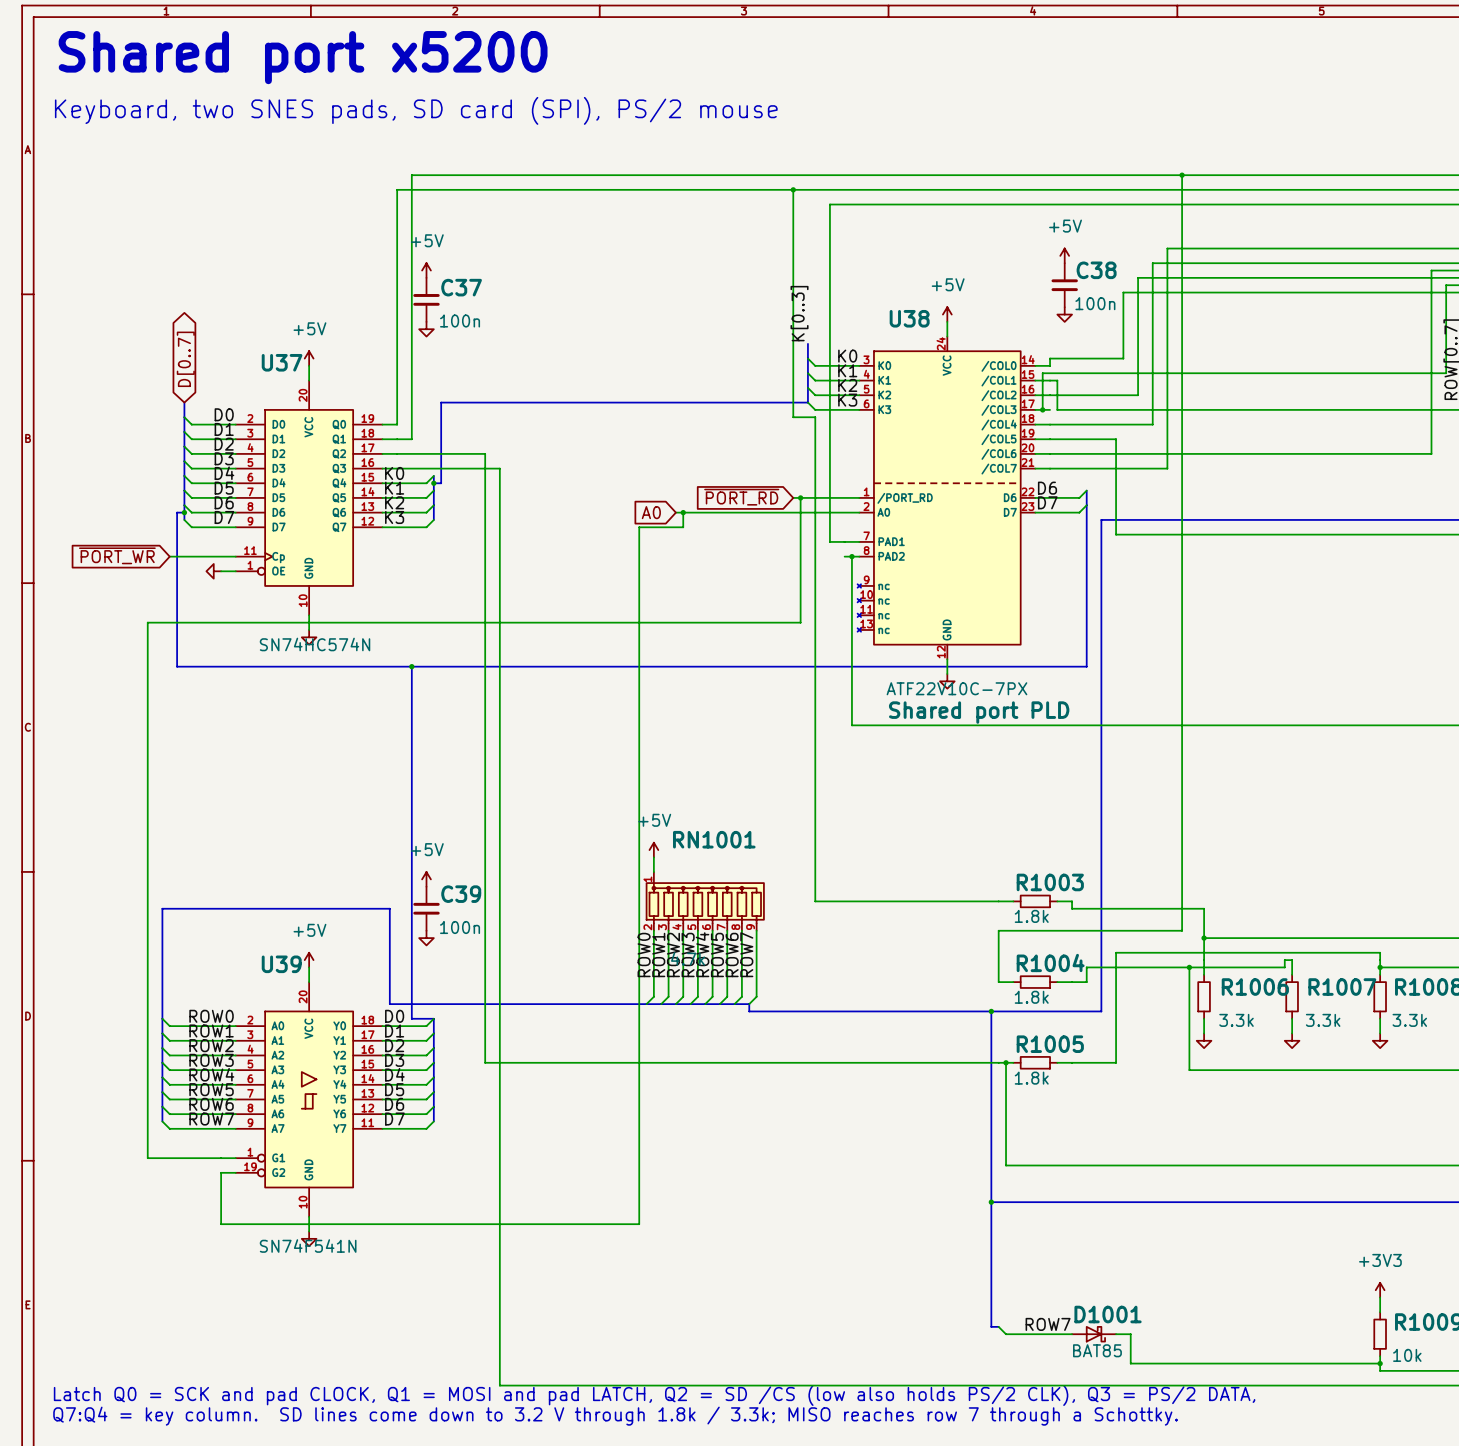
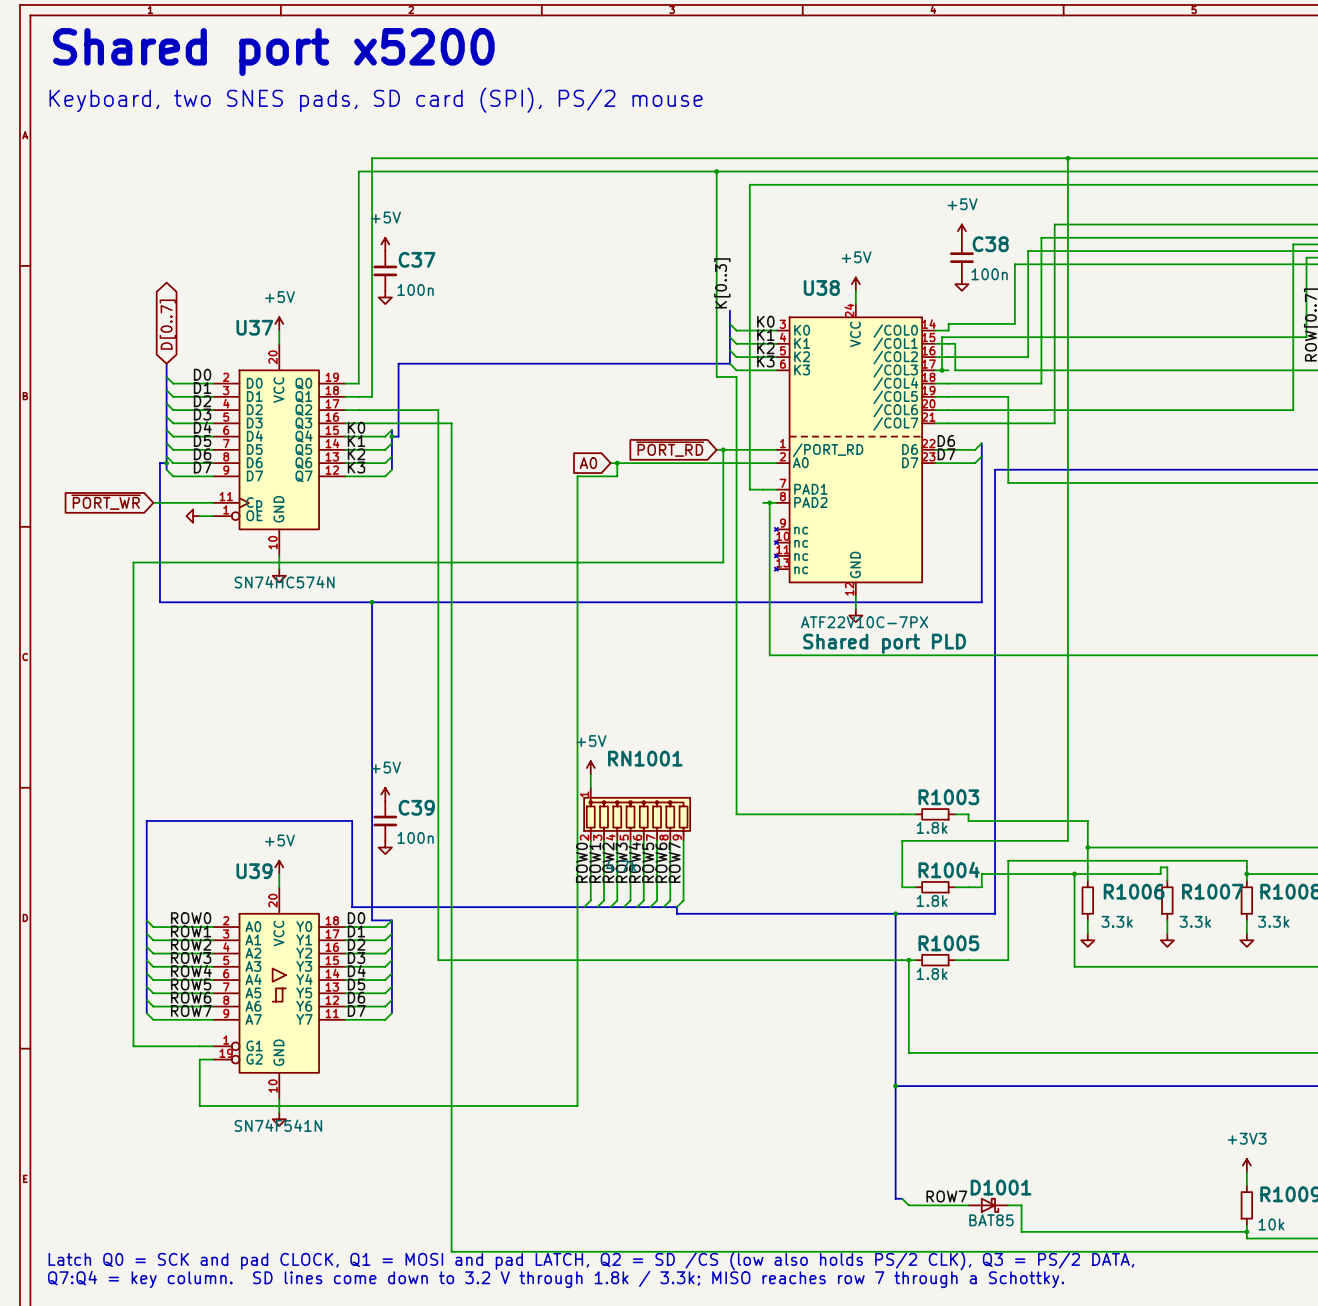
U38 symbol: [857, 336, 1036, 660] -> [774, 304, 936, 596]
U37 symbol: [235, 380, 383, 616] -> [213, 343, 346, 556]
RN1001 symbol: [645, 872, 765, 931] -> [583, 787, 691, 841]
U39 symbol: [235, 982, 383, 1217] -> [213, 887, 346, 1100]

